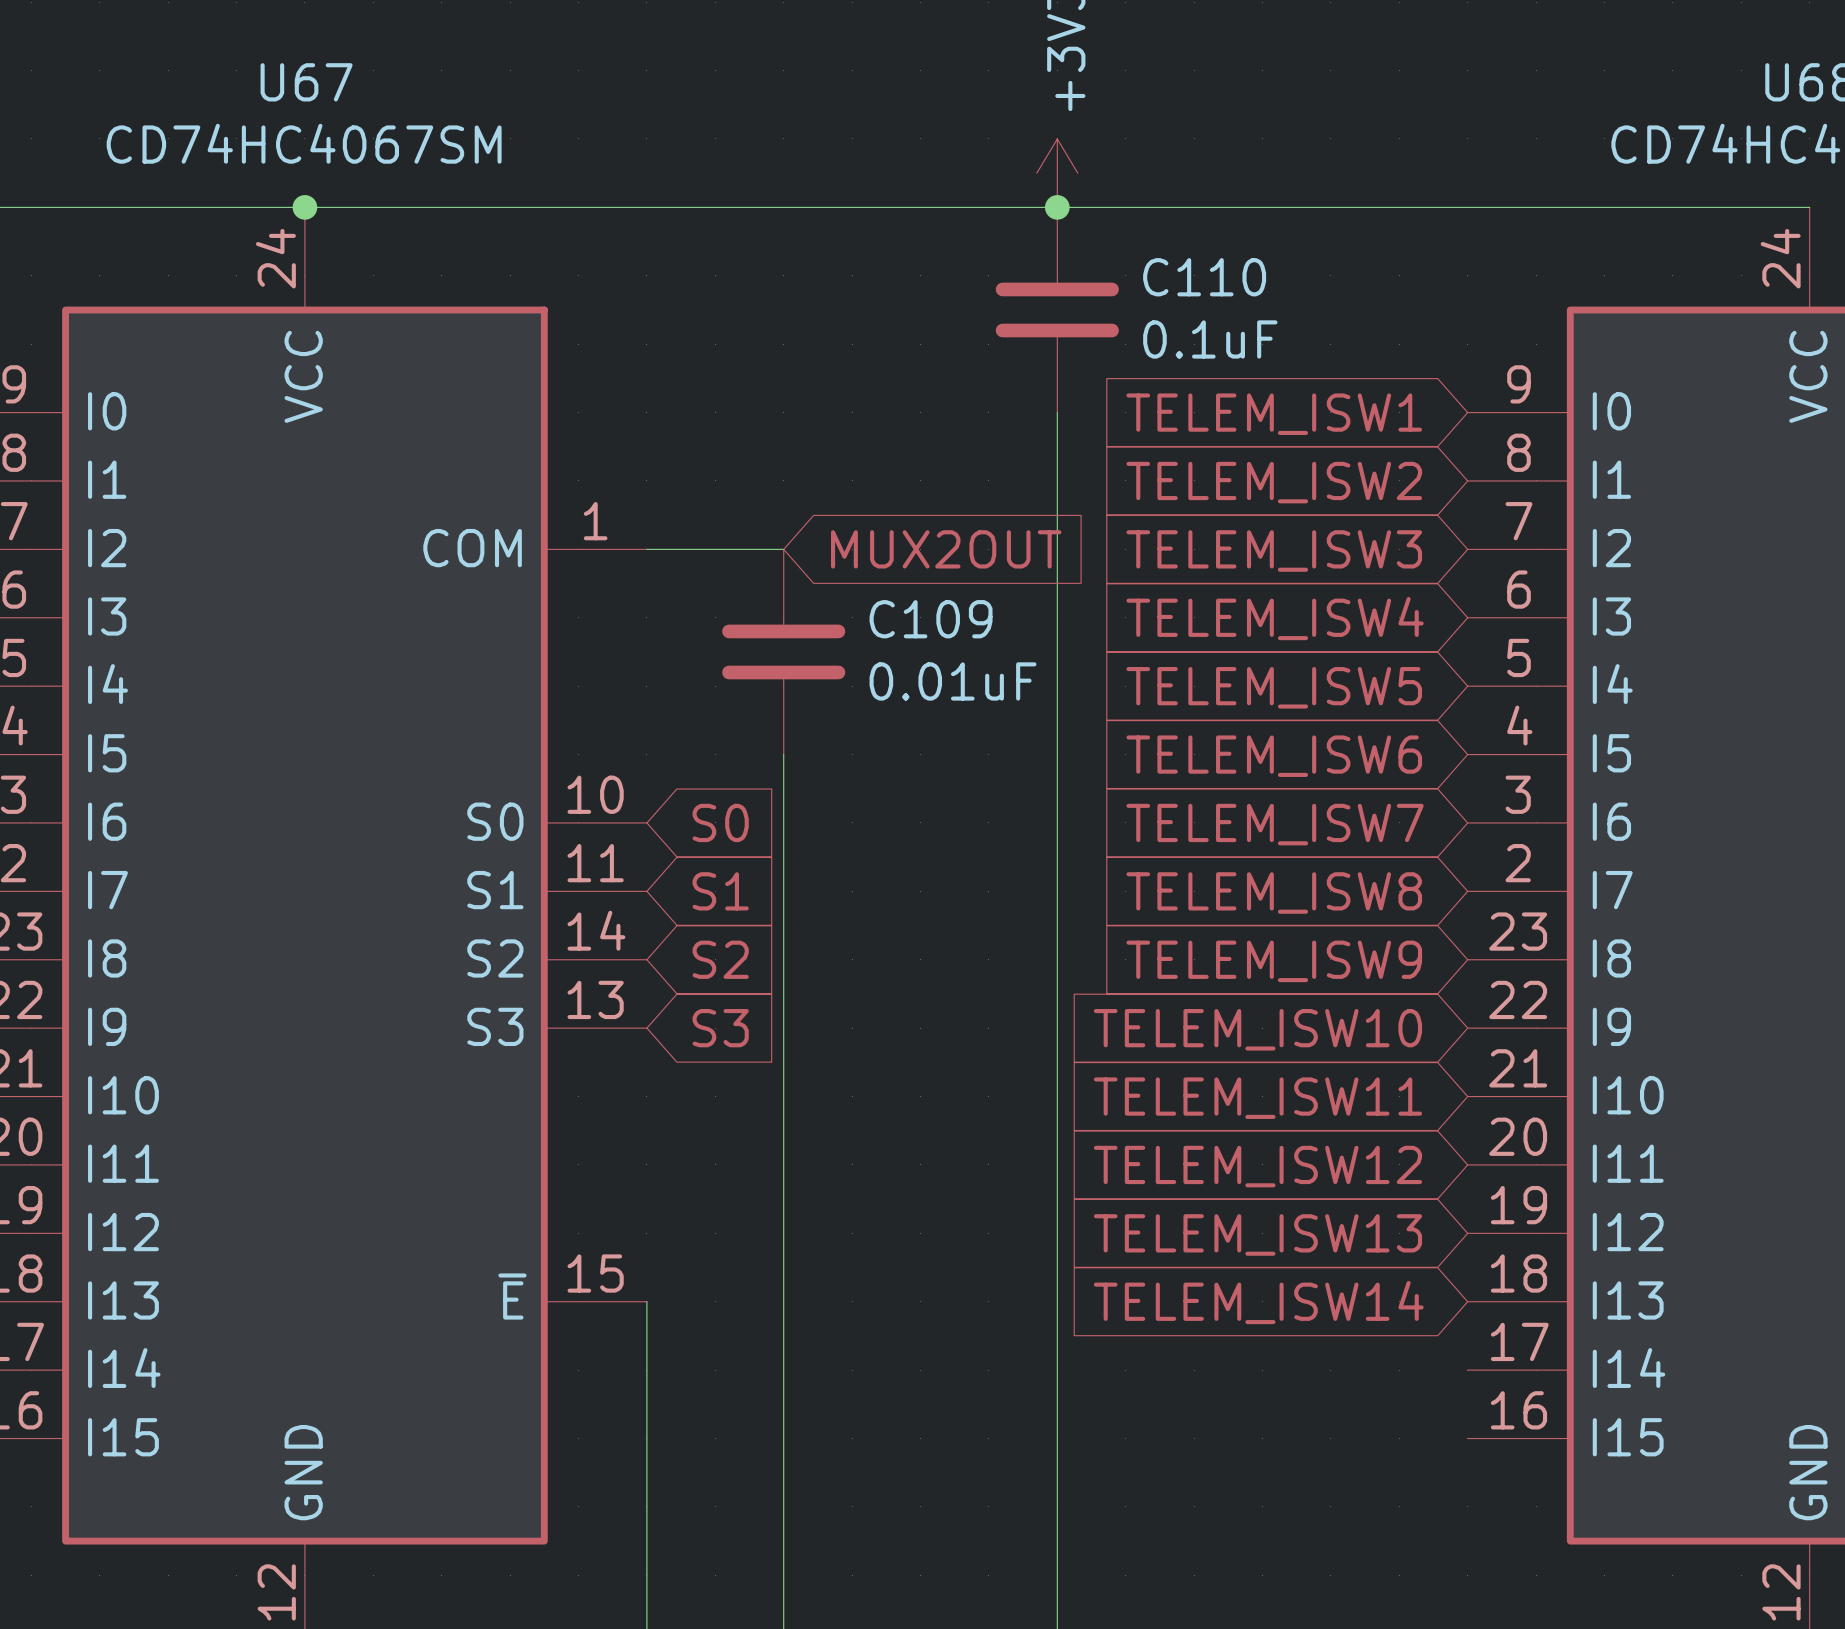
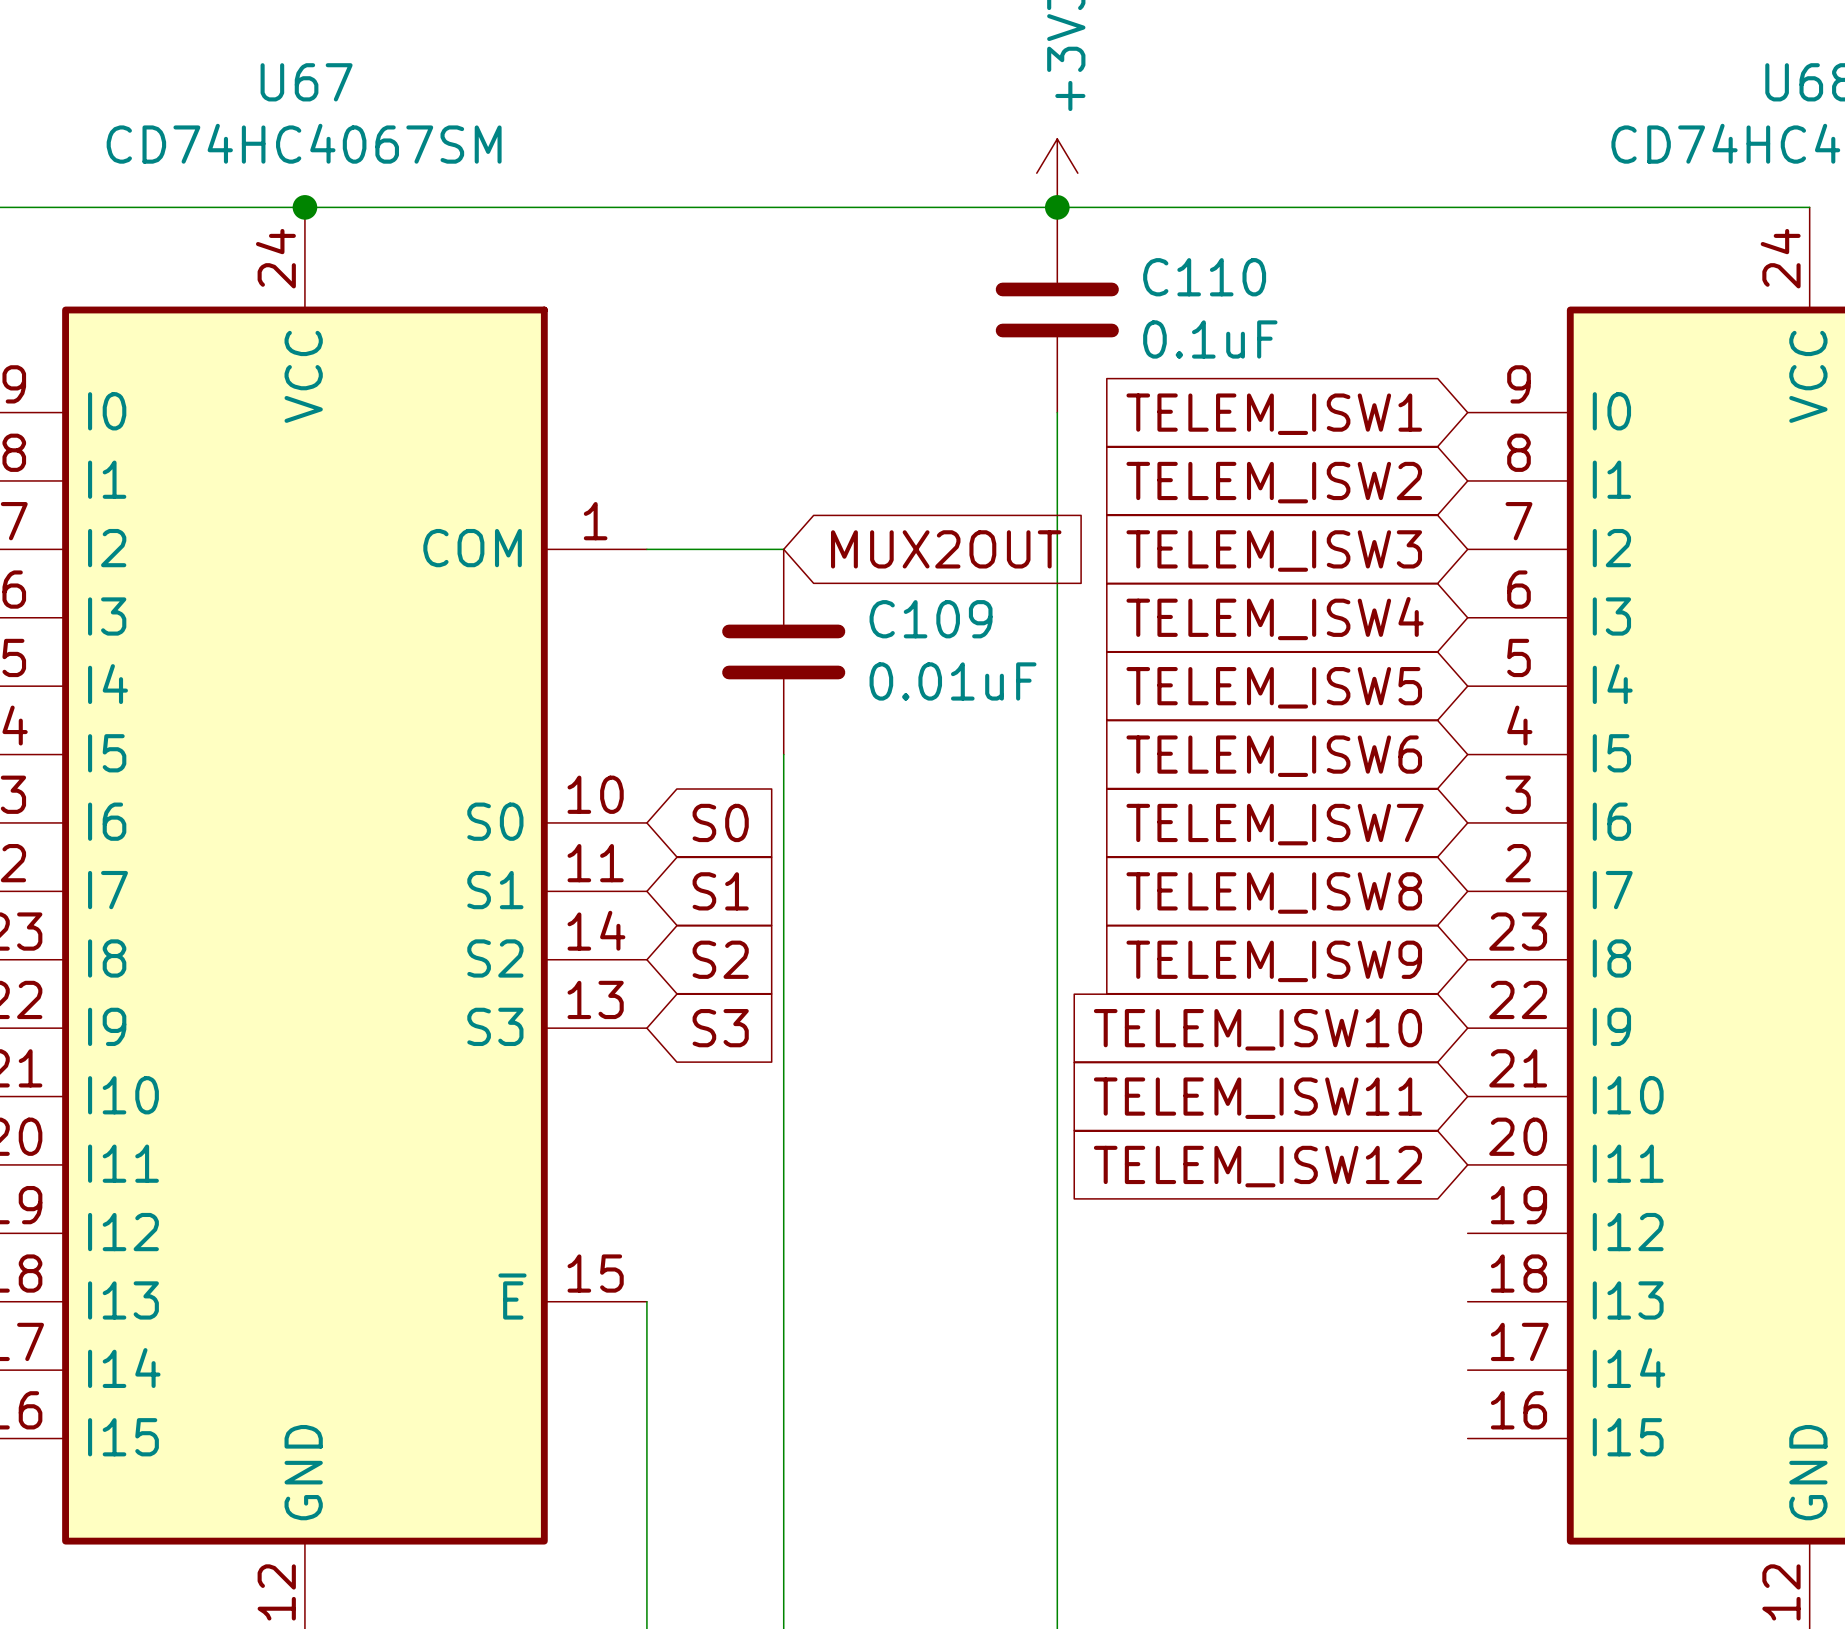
global label: TELEM_ISW13 (1257, 1234) -> none
global label: TELEM_ISW14 (1258, 1302) -> none

